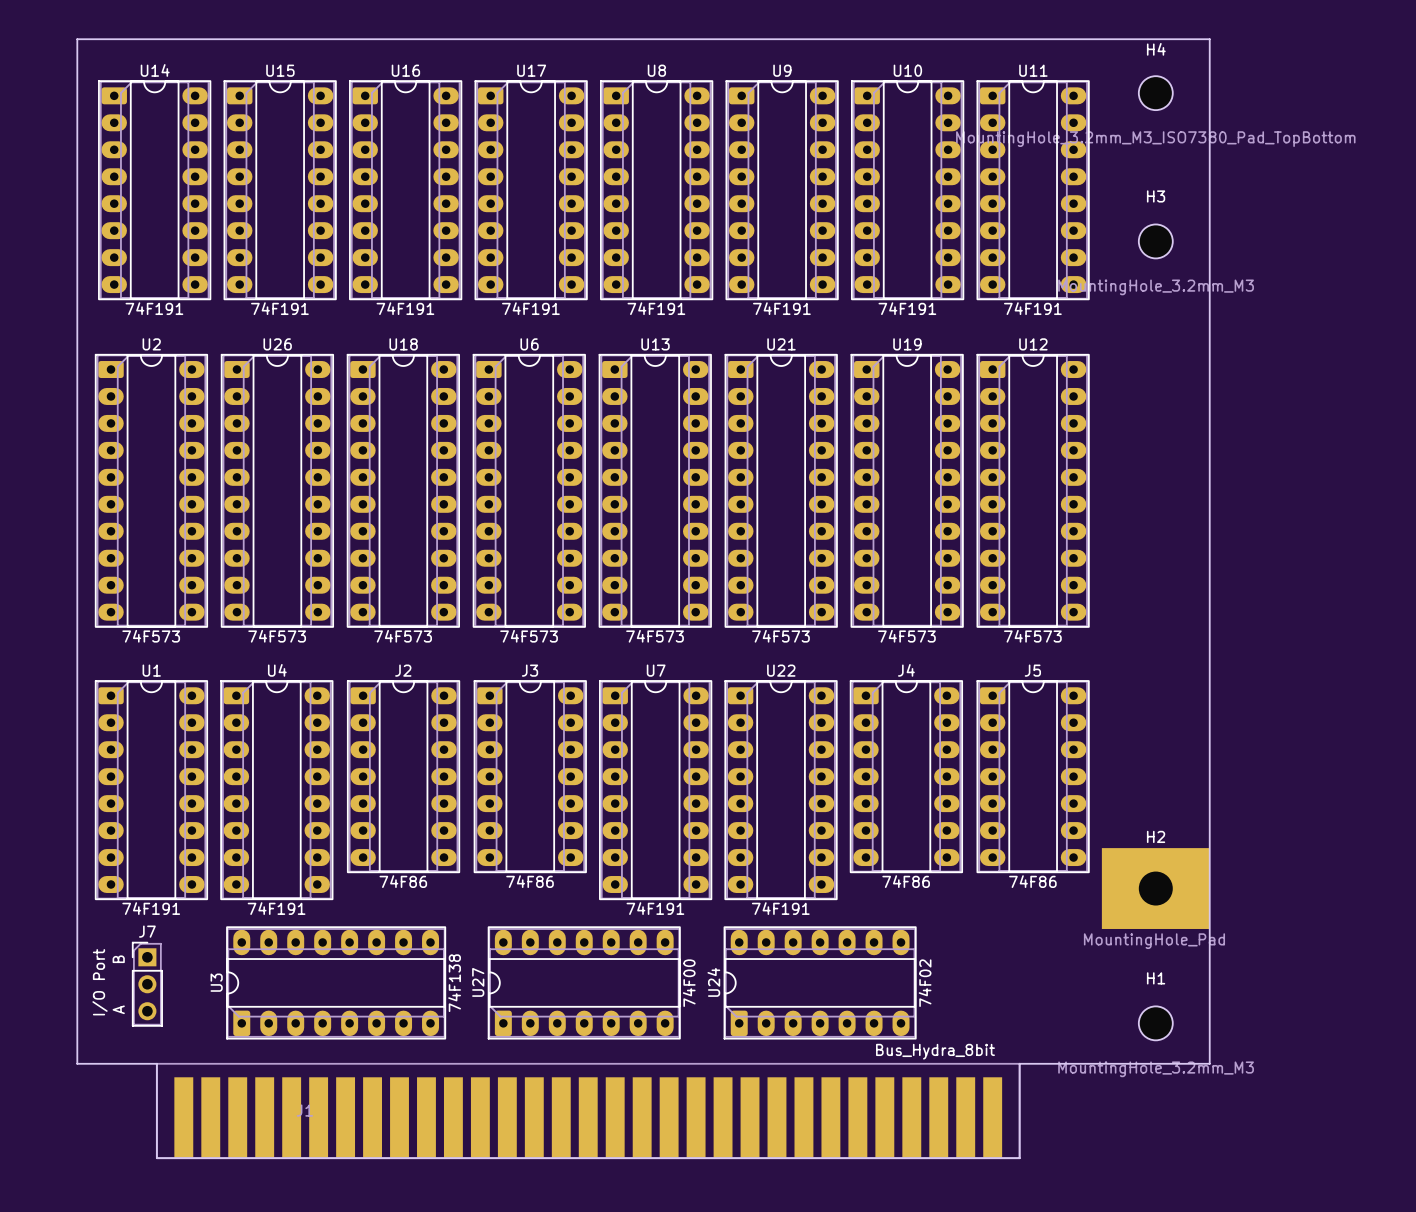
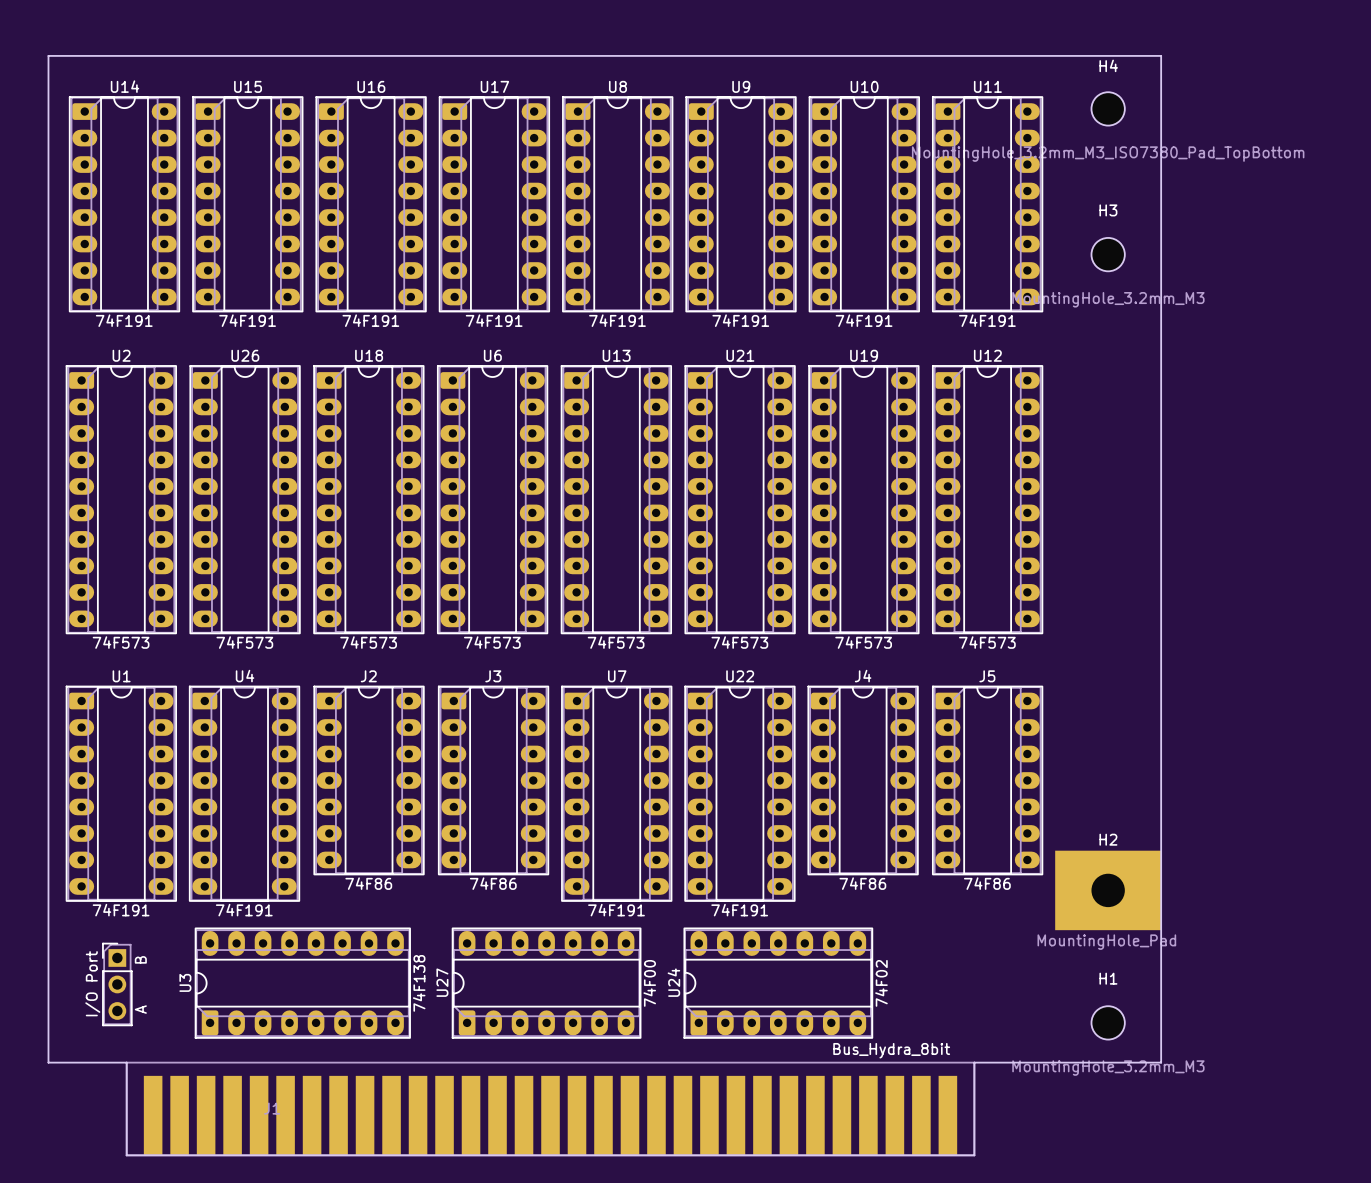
J7 name: J7 (147, 931) -> I/O Port (92, 983)
text: I/O Port (100, 982) -> none
J7 value position: A B (118, 984) -> A B (140, 984)

